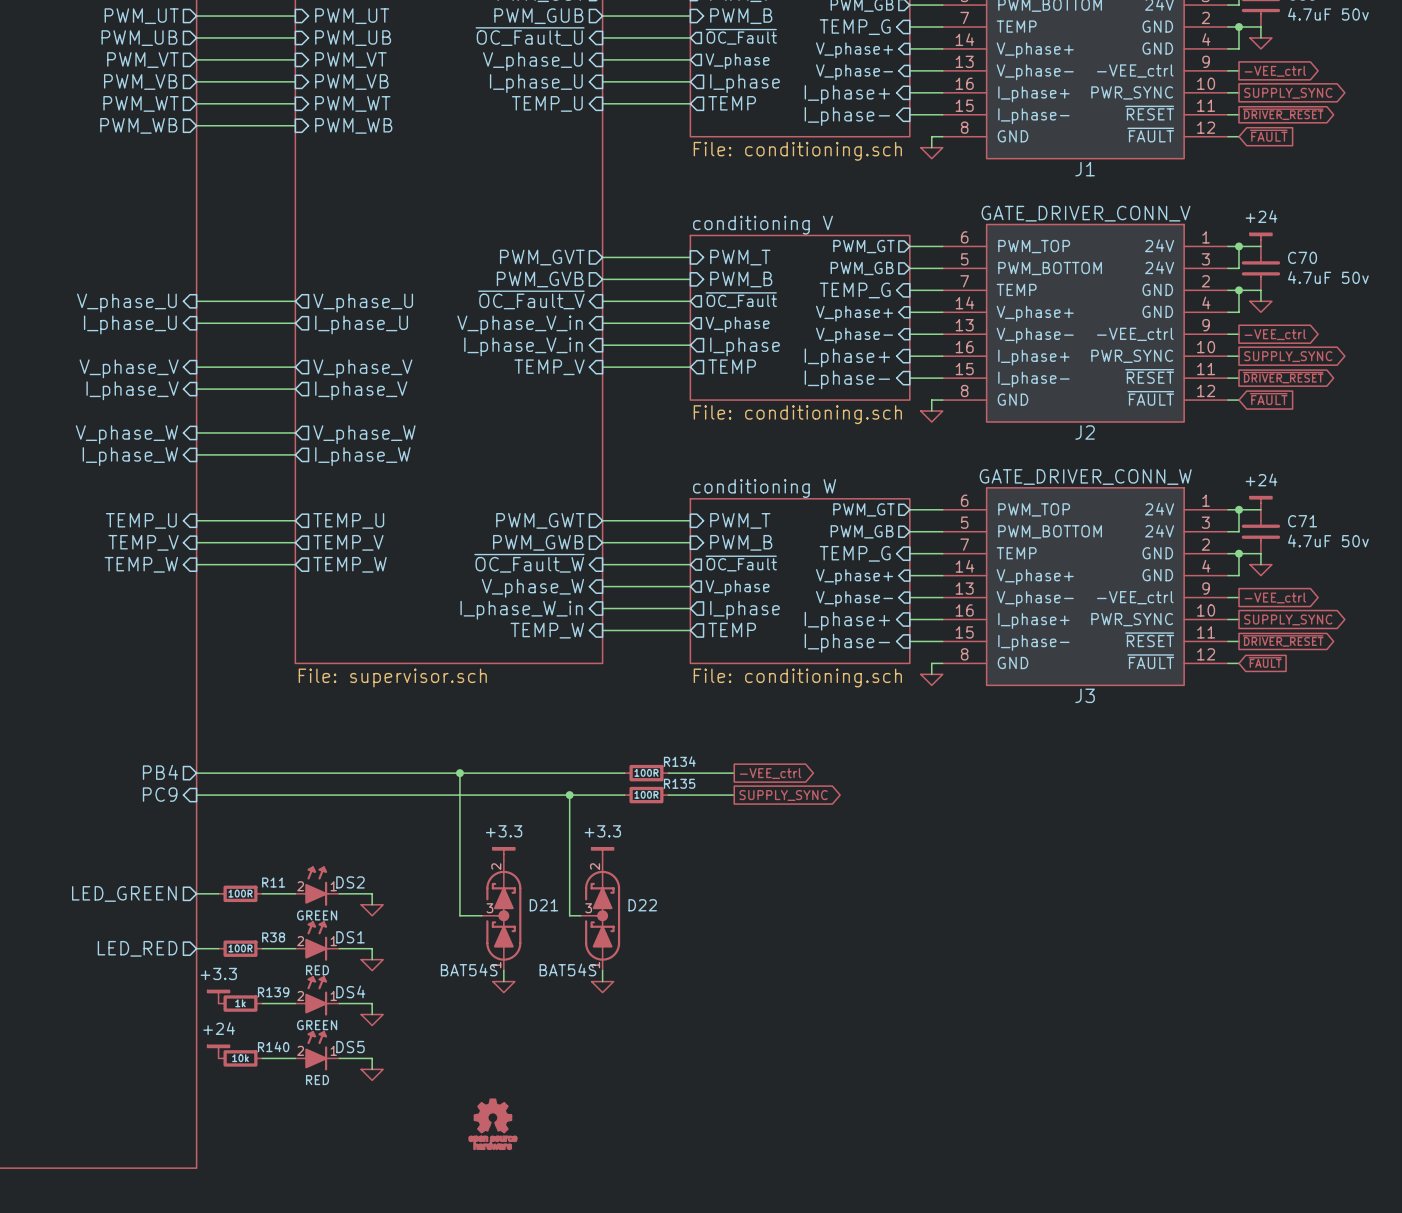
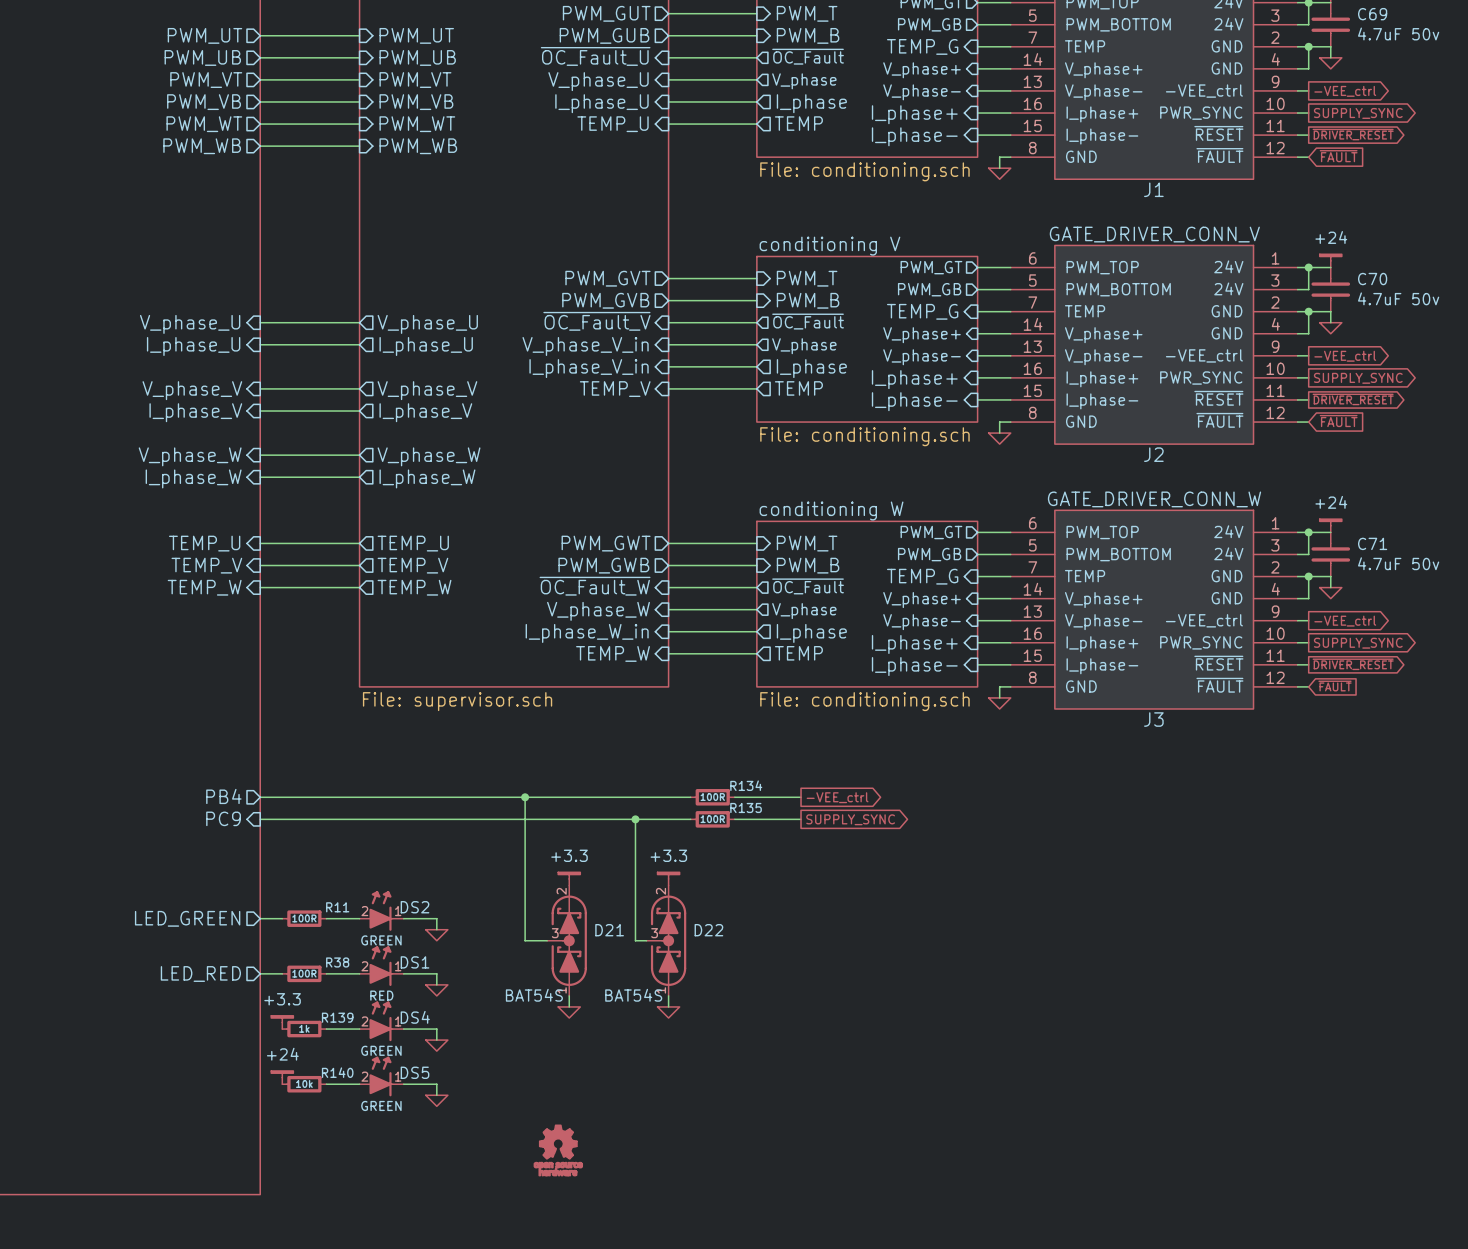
DS5 value: RED (317, 1080) -> GREEN (381, 1105)

